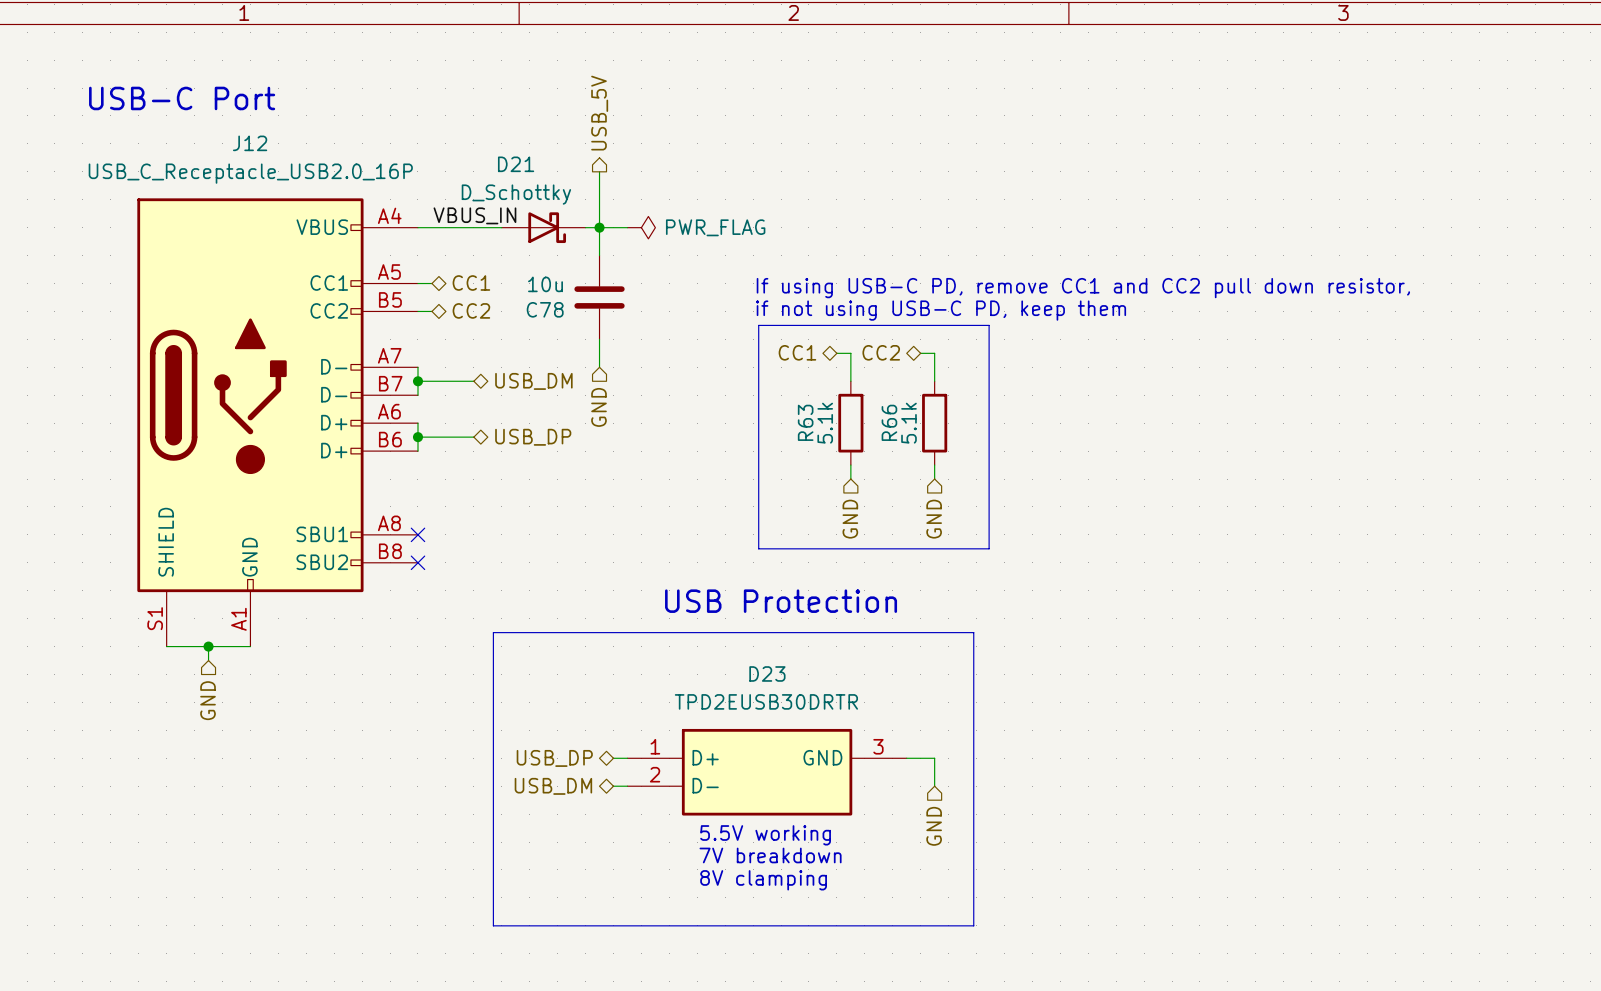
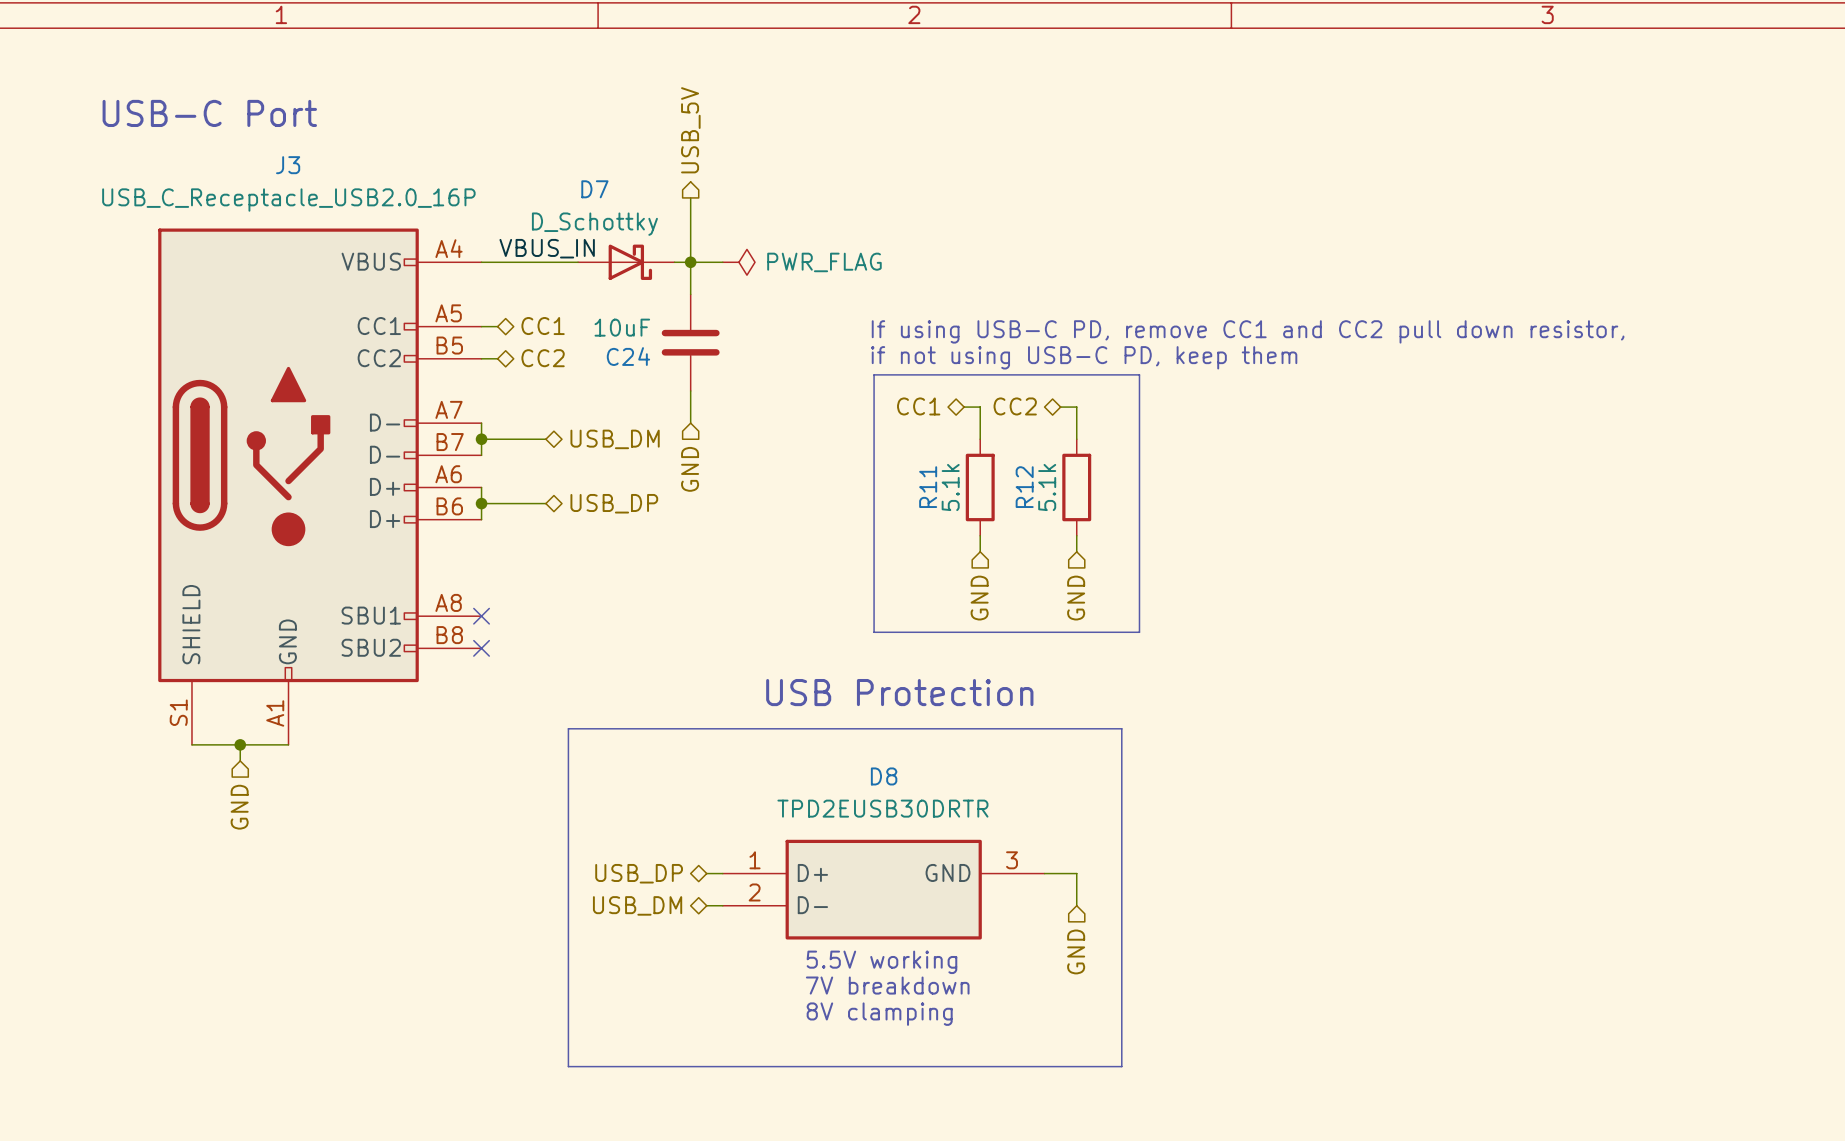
J12 name: J12 (250, 143) -> J3 (288, 165)
D21 name: D21 (516, 164) -> D7 (594, 189)
C78 value: 10u (545, 284) -> 10uF (622, 327)
C78 name: C78 (545, 309) -> C24 (628, 356)
R63 name: R63 (805, 422) -> R11 (928, 487)
R66 name: R66 (889, 422) -> R12 (1024, 487)
D23 name: D23 (767, 673) -> D8 (884, 776)

